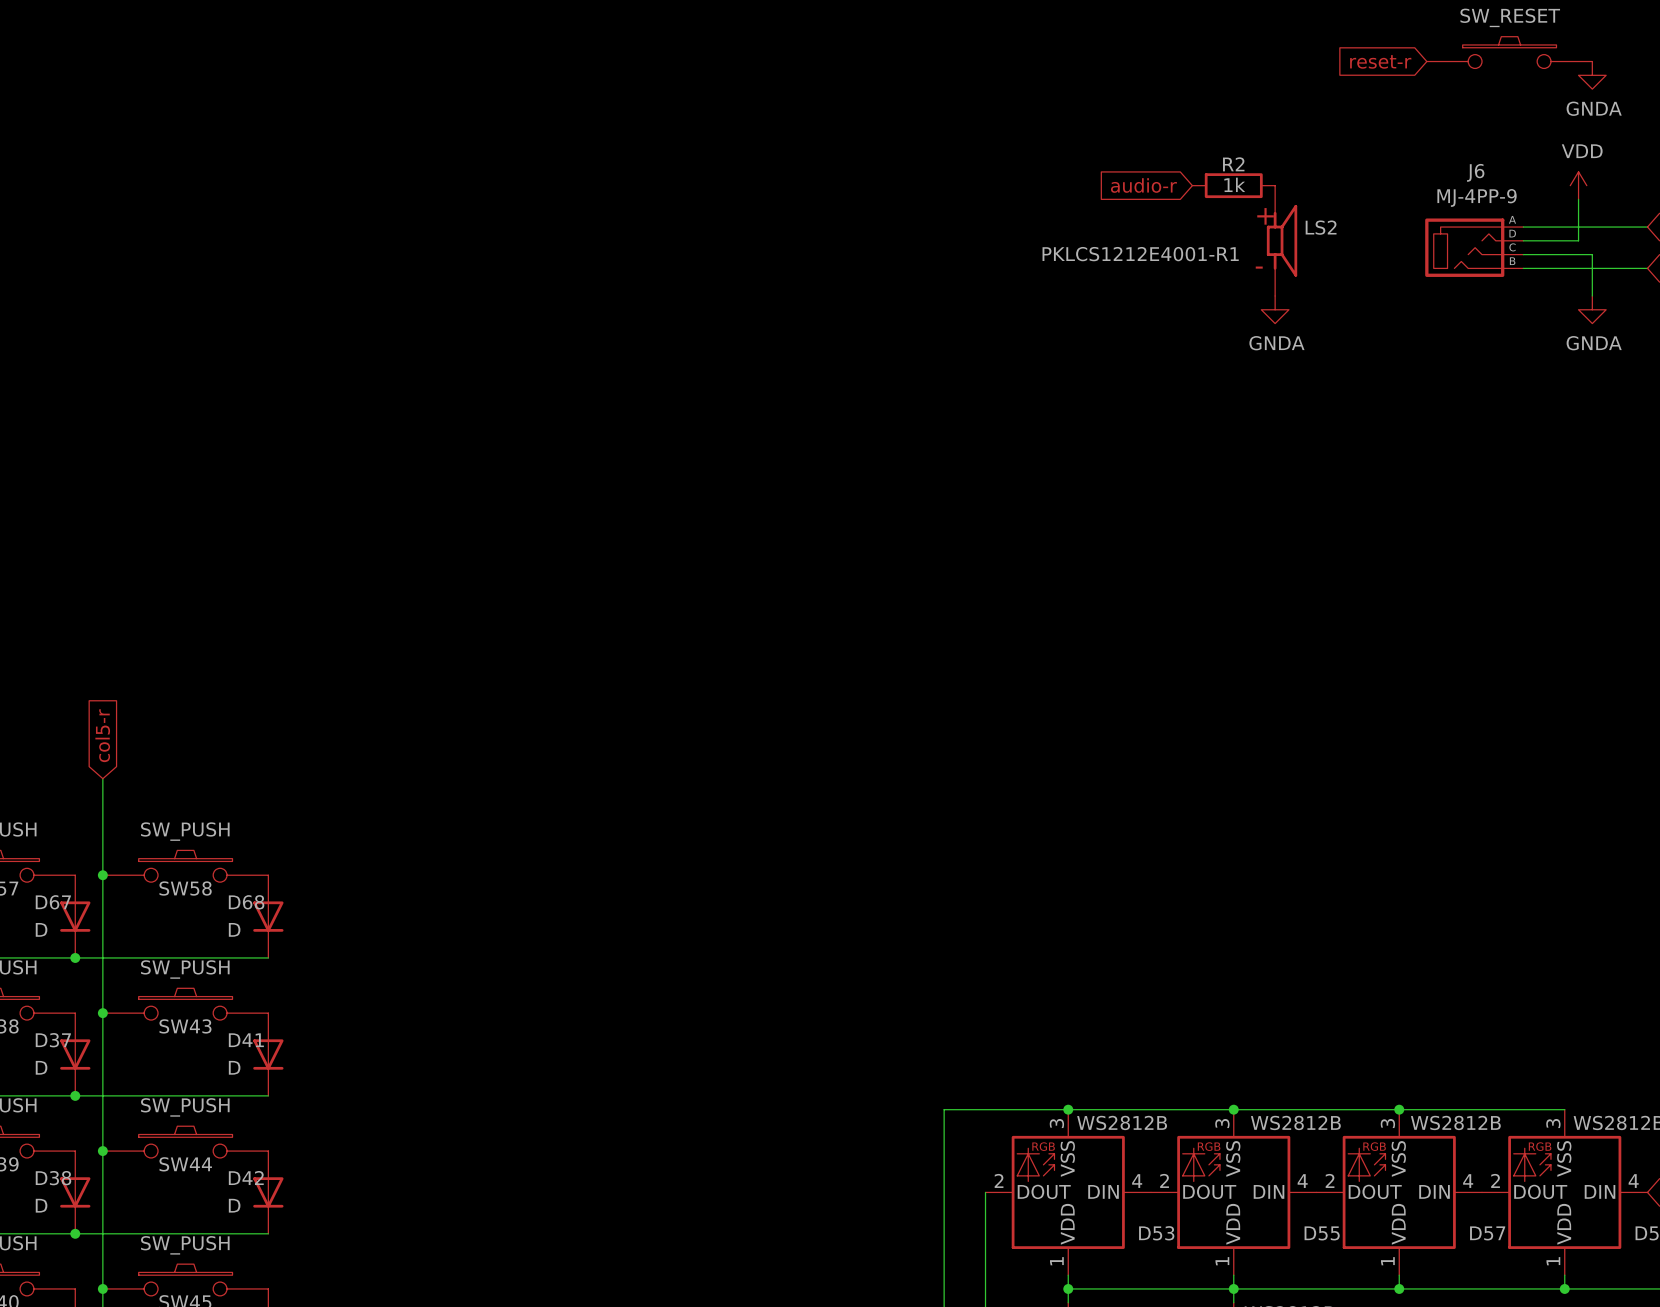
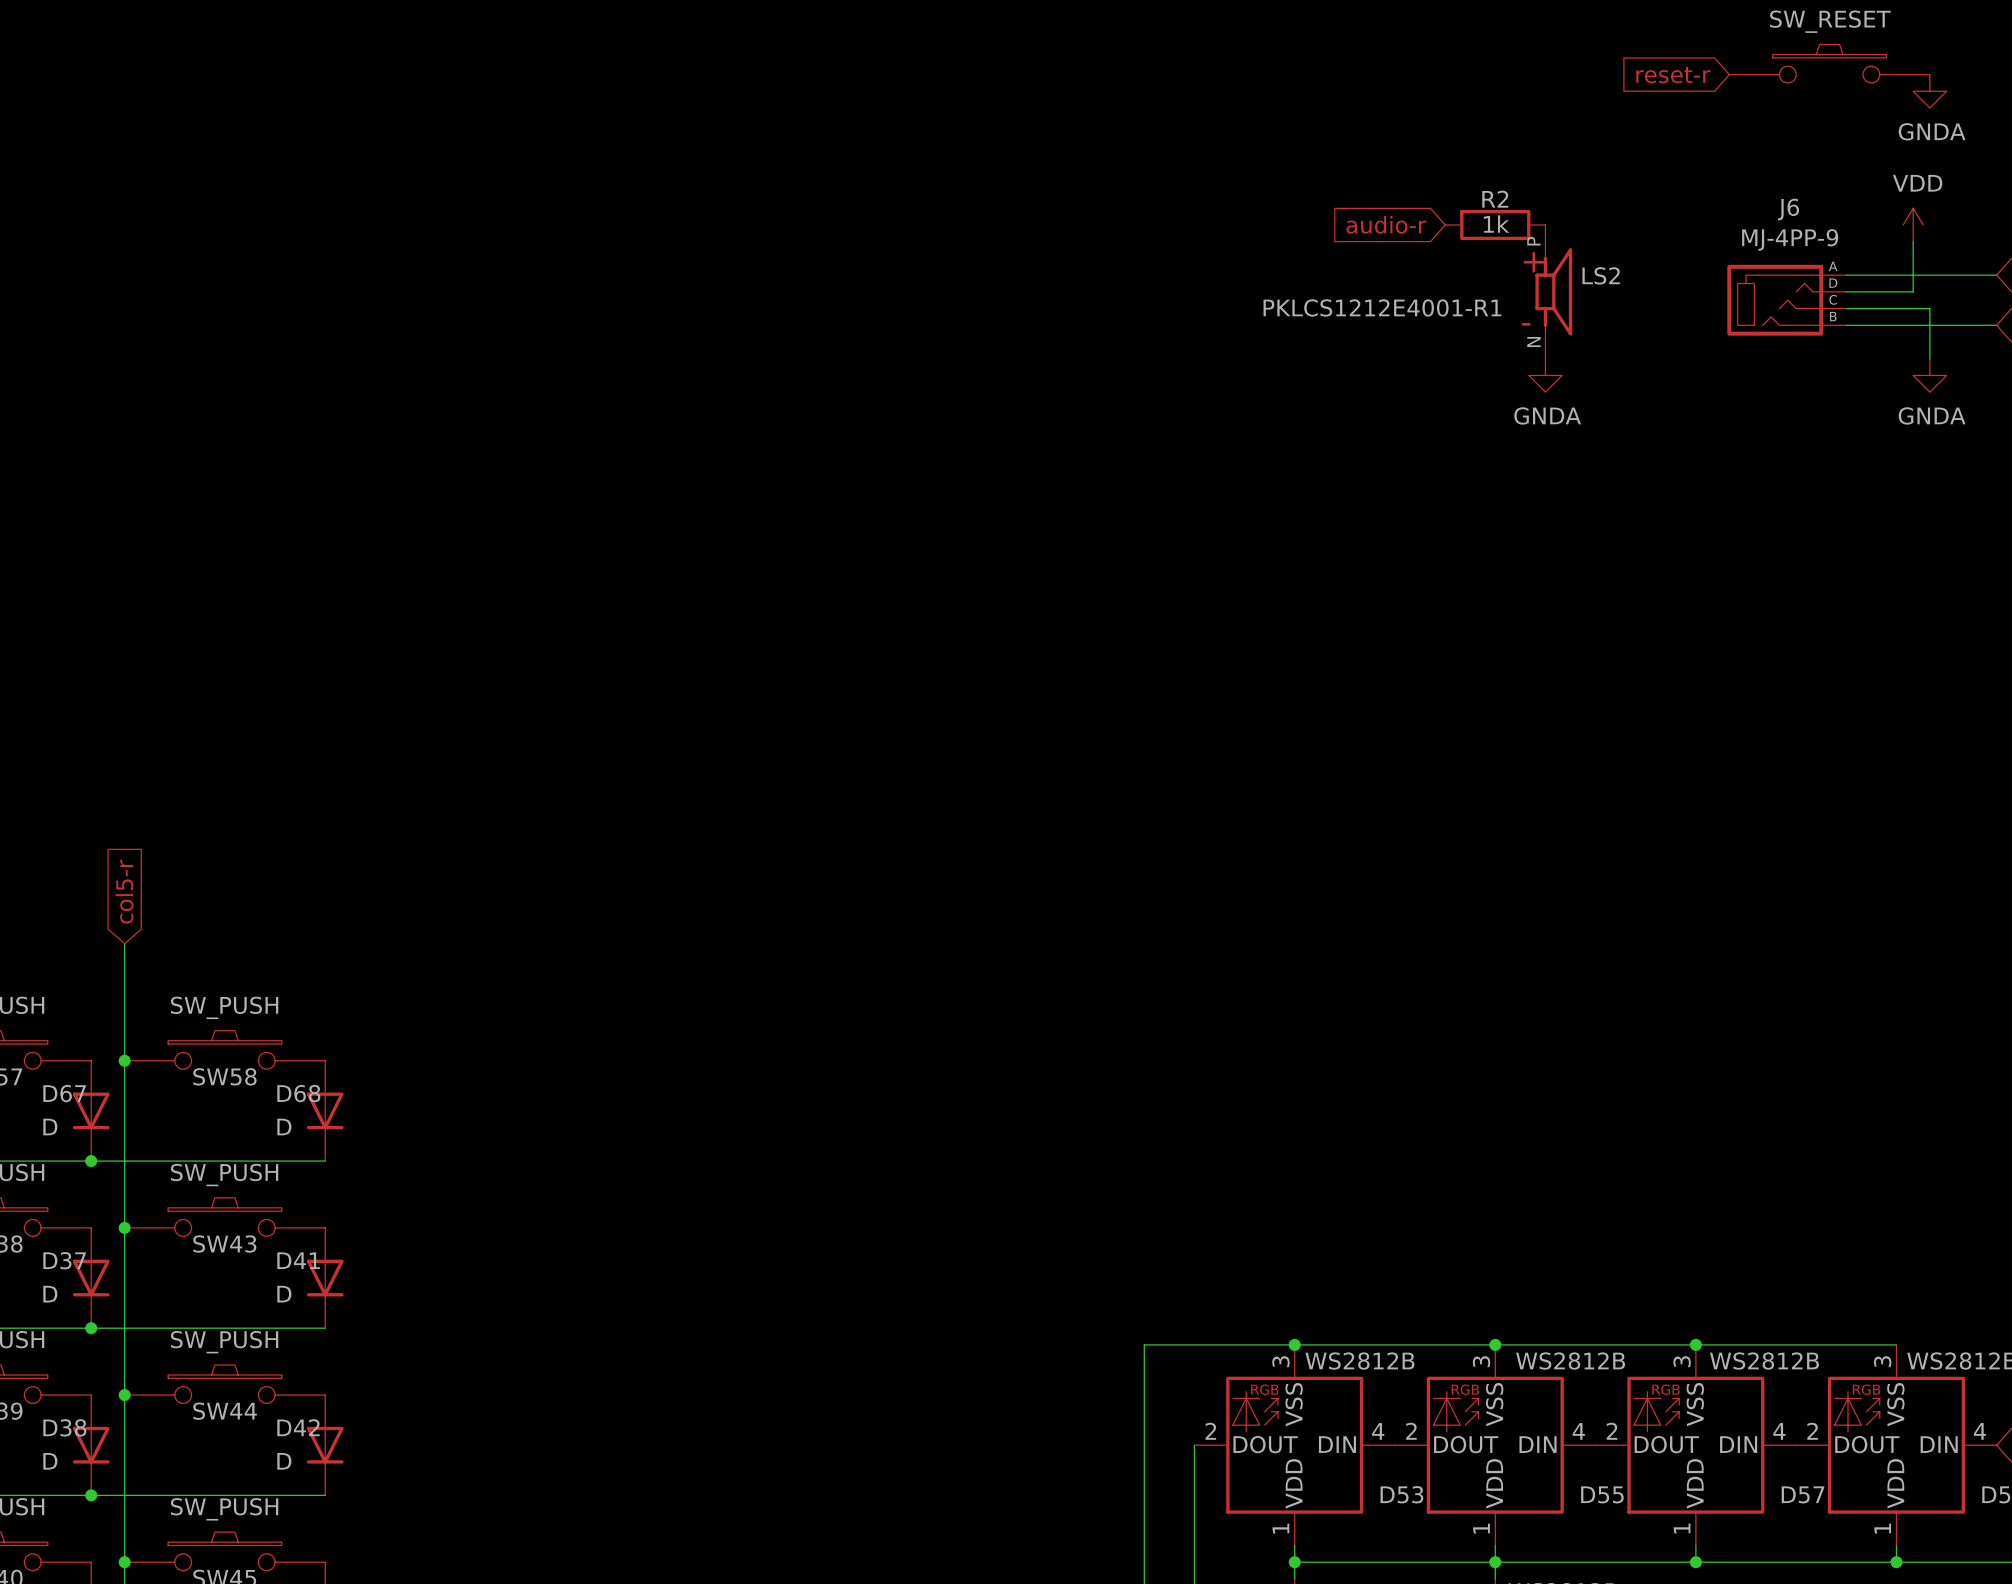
LS2 pin number: none -> P (1533, 241)
LS2 pin number: none -> N (1533, 342)

